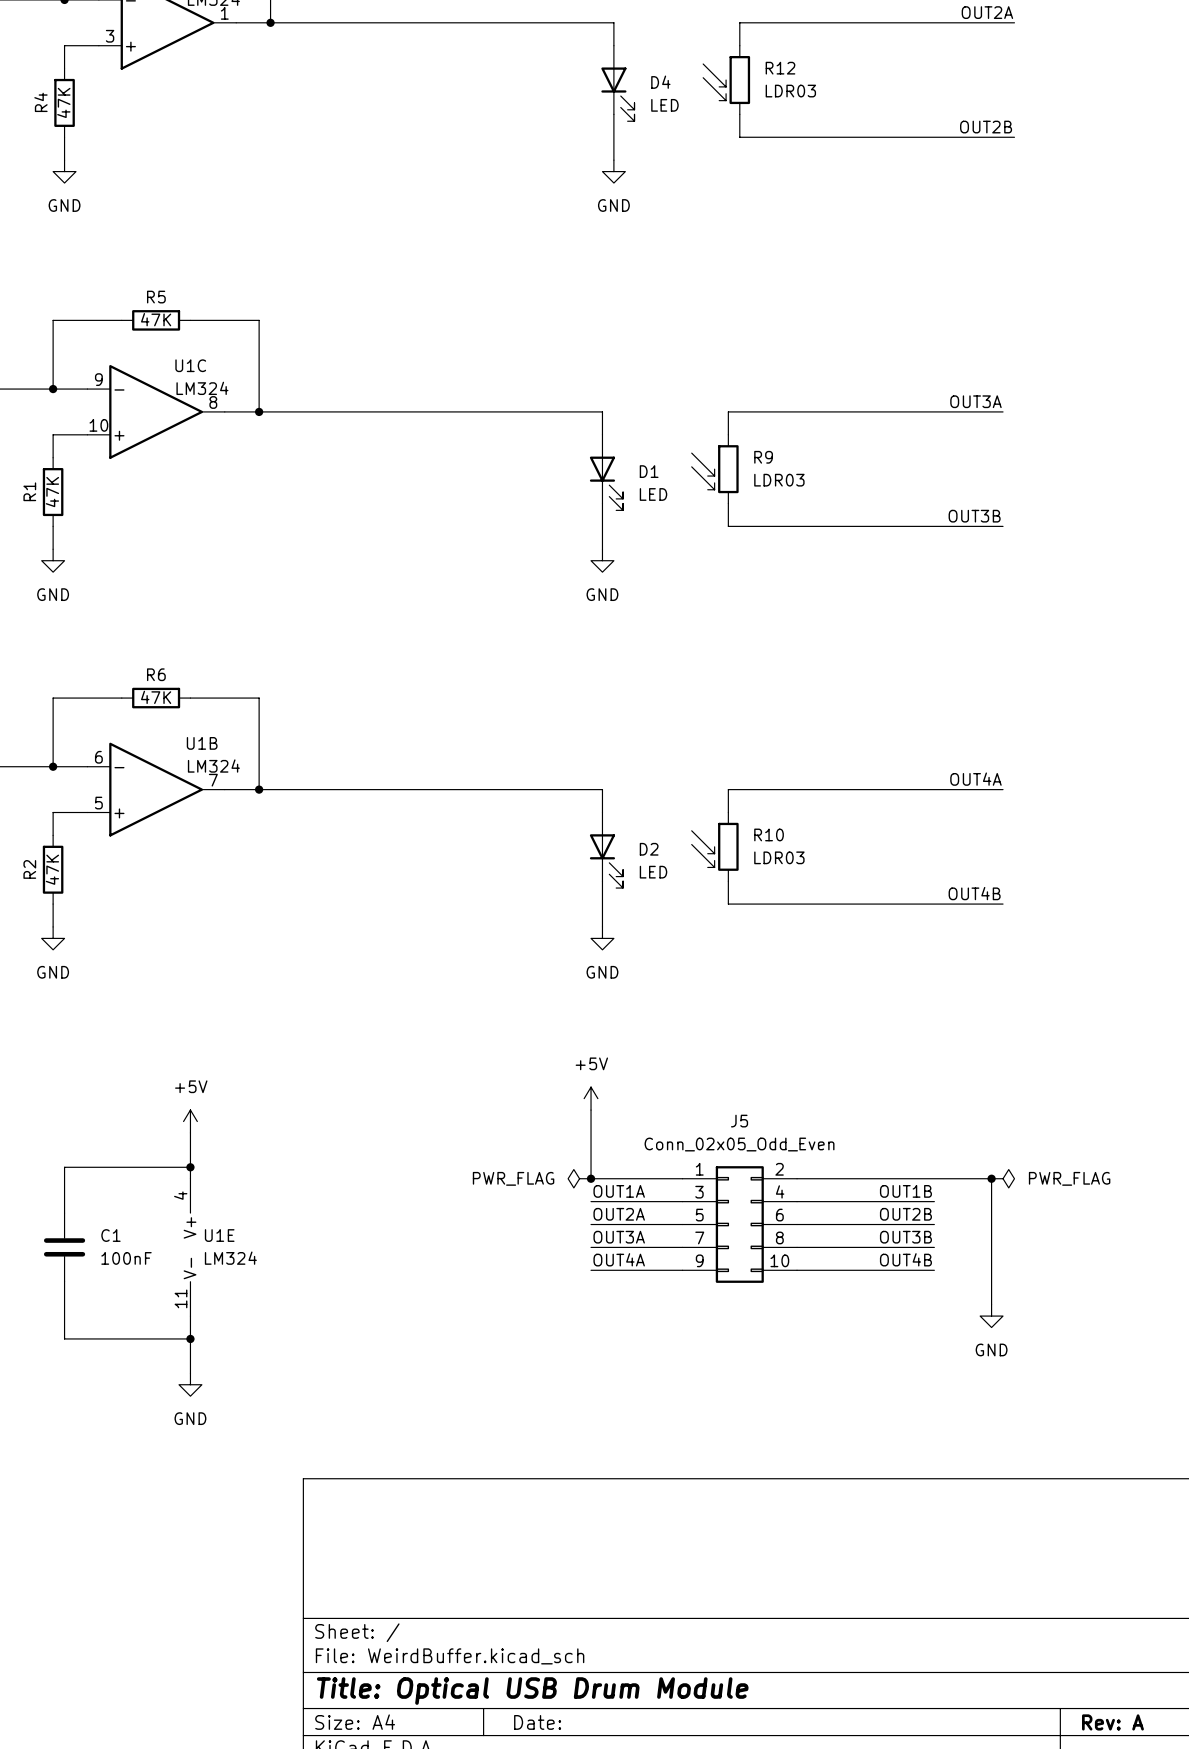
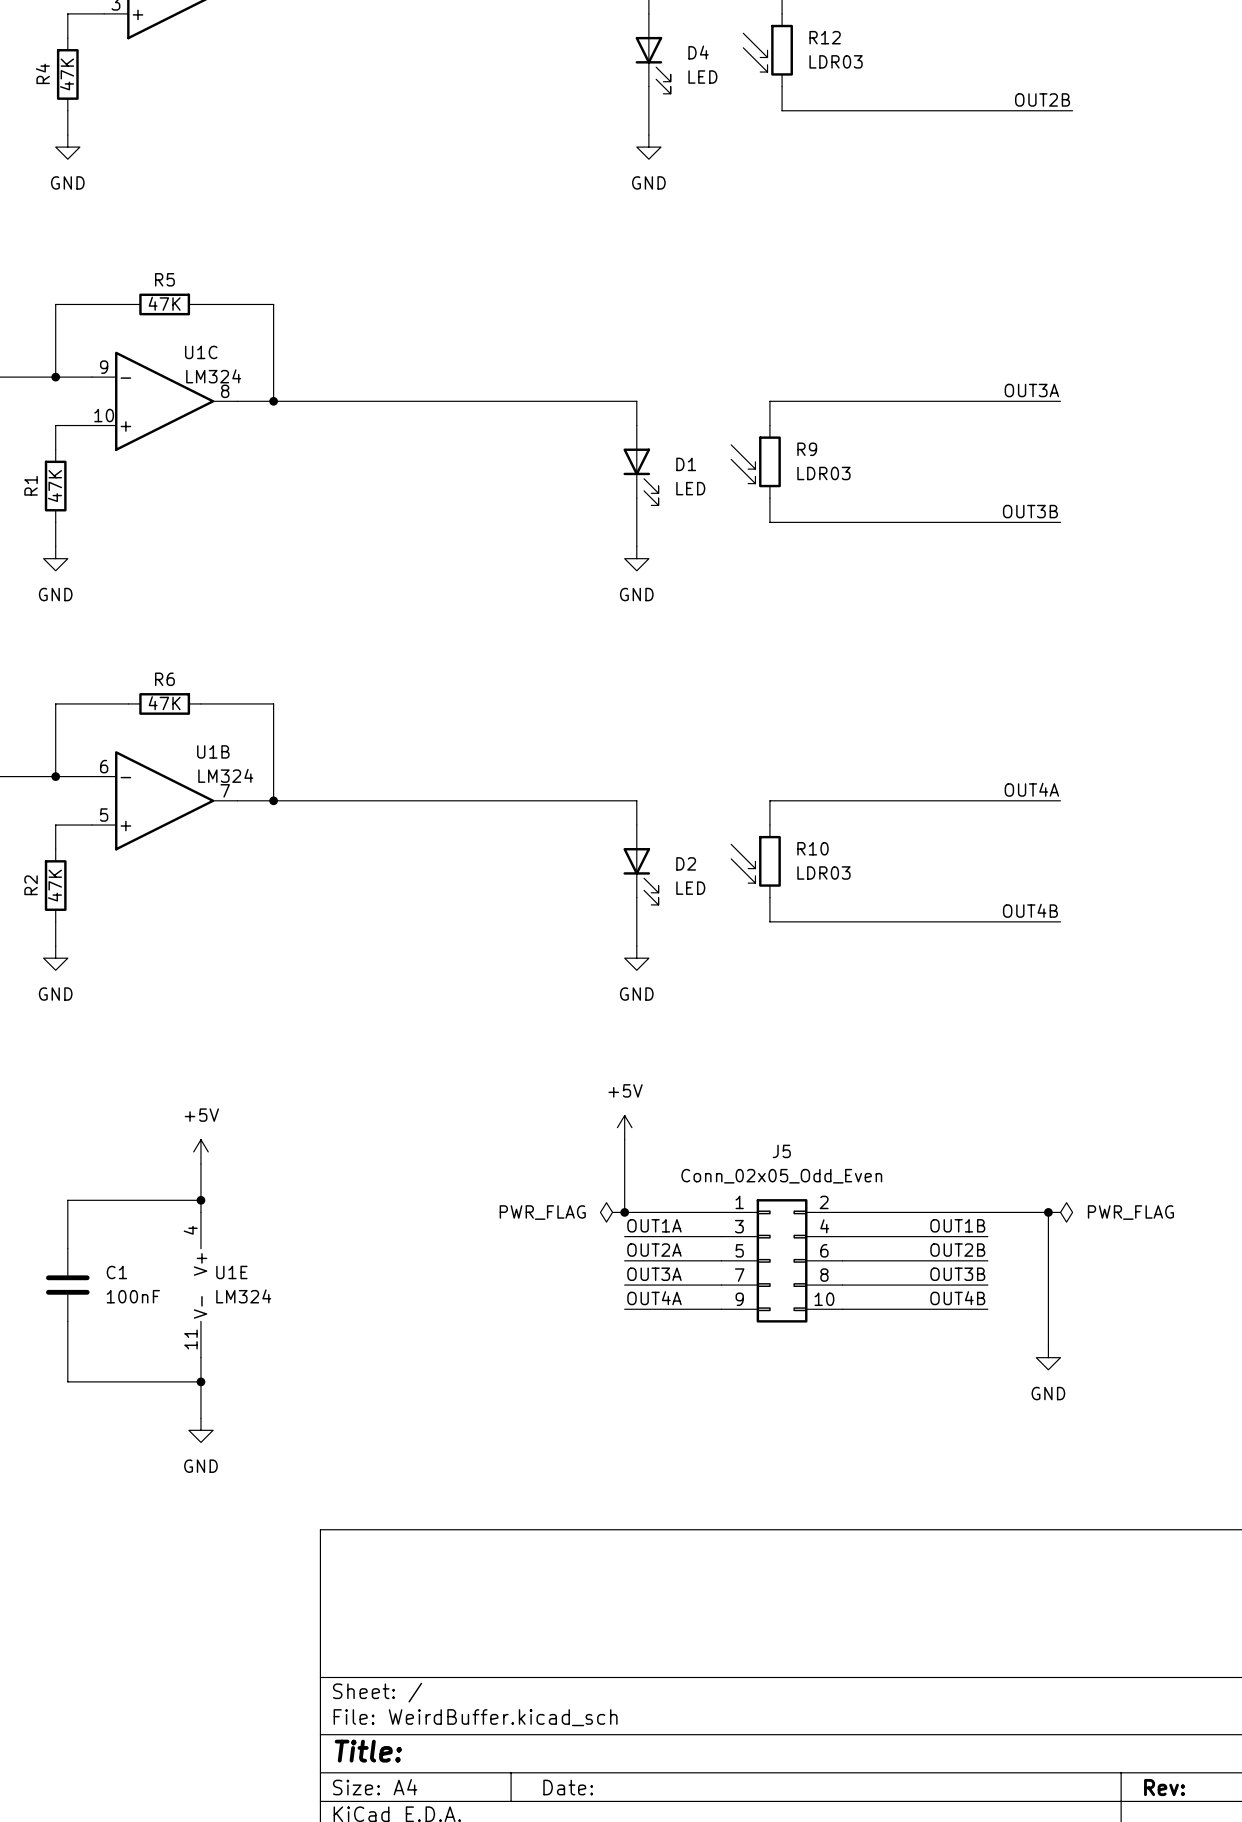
title block: Title: Optical USB Drum Module (532, 1691) -> Title: (368, 1751)
title block: Rev: A (1112, 1722) -> Rev: (1164, 1787)

